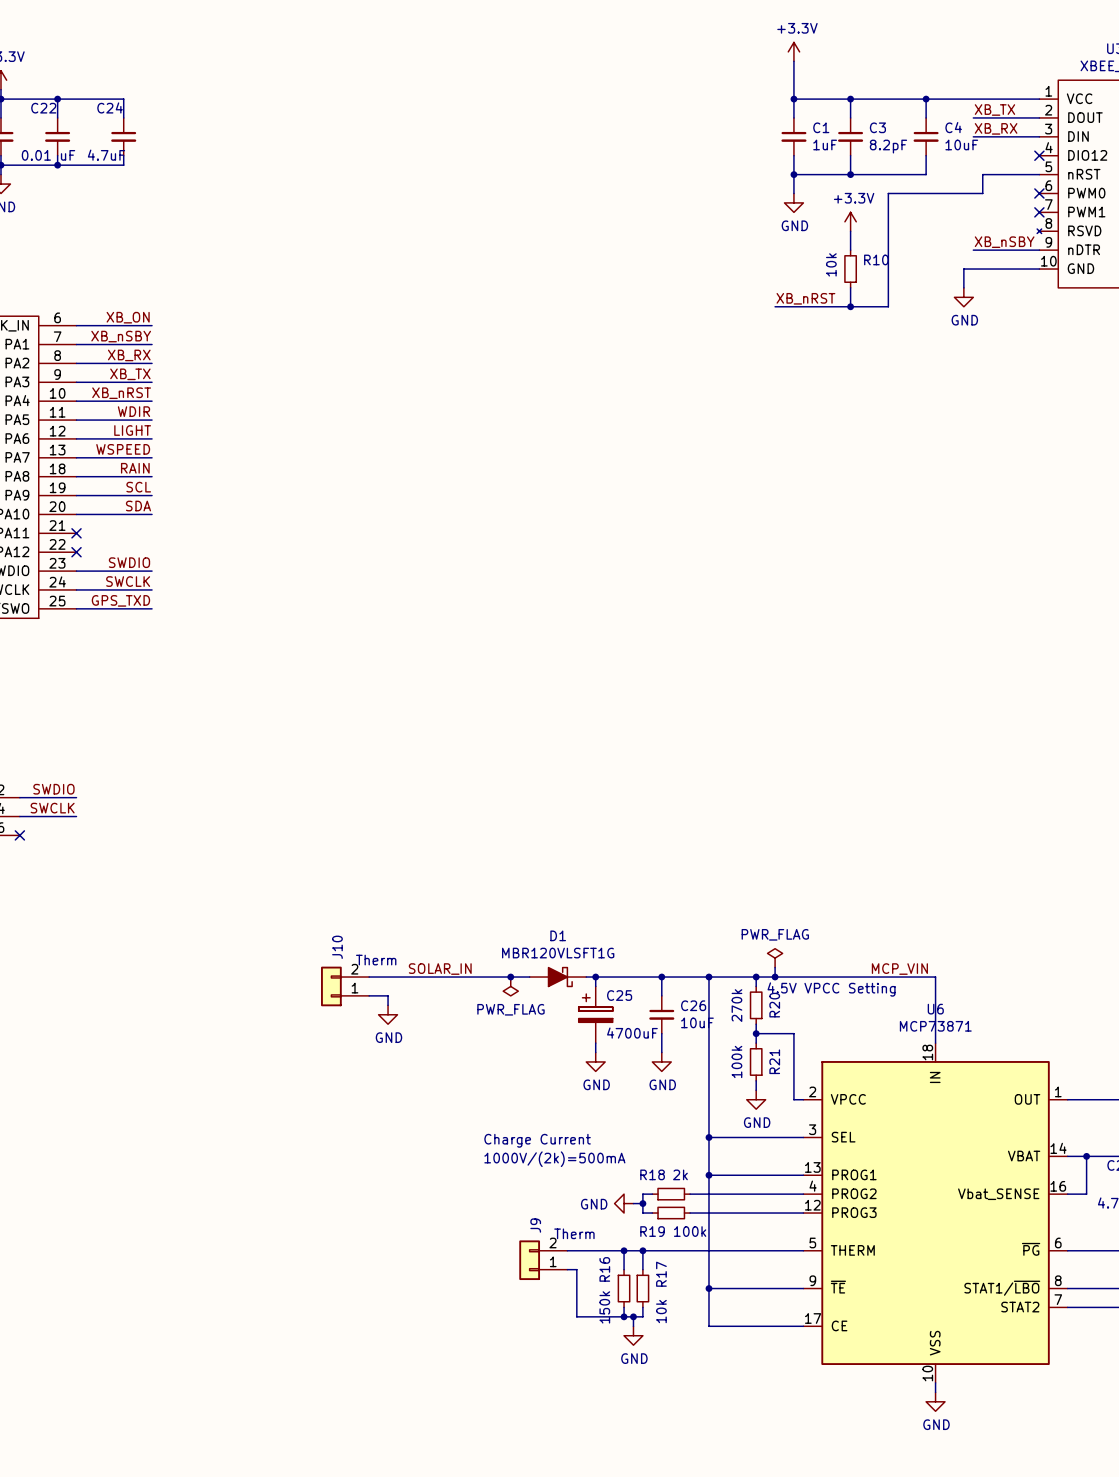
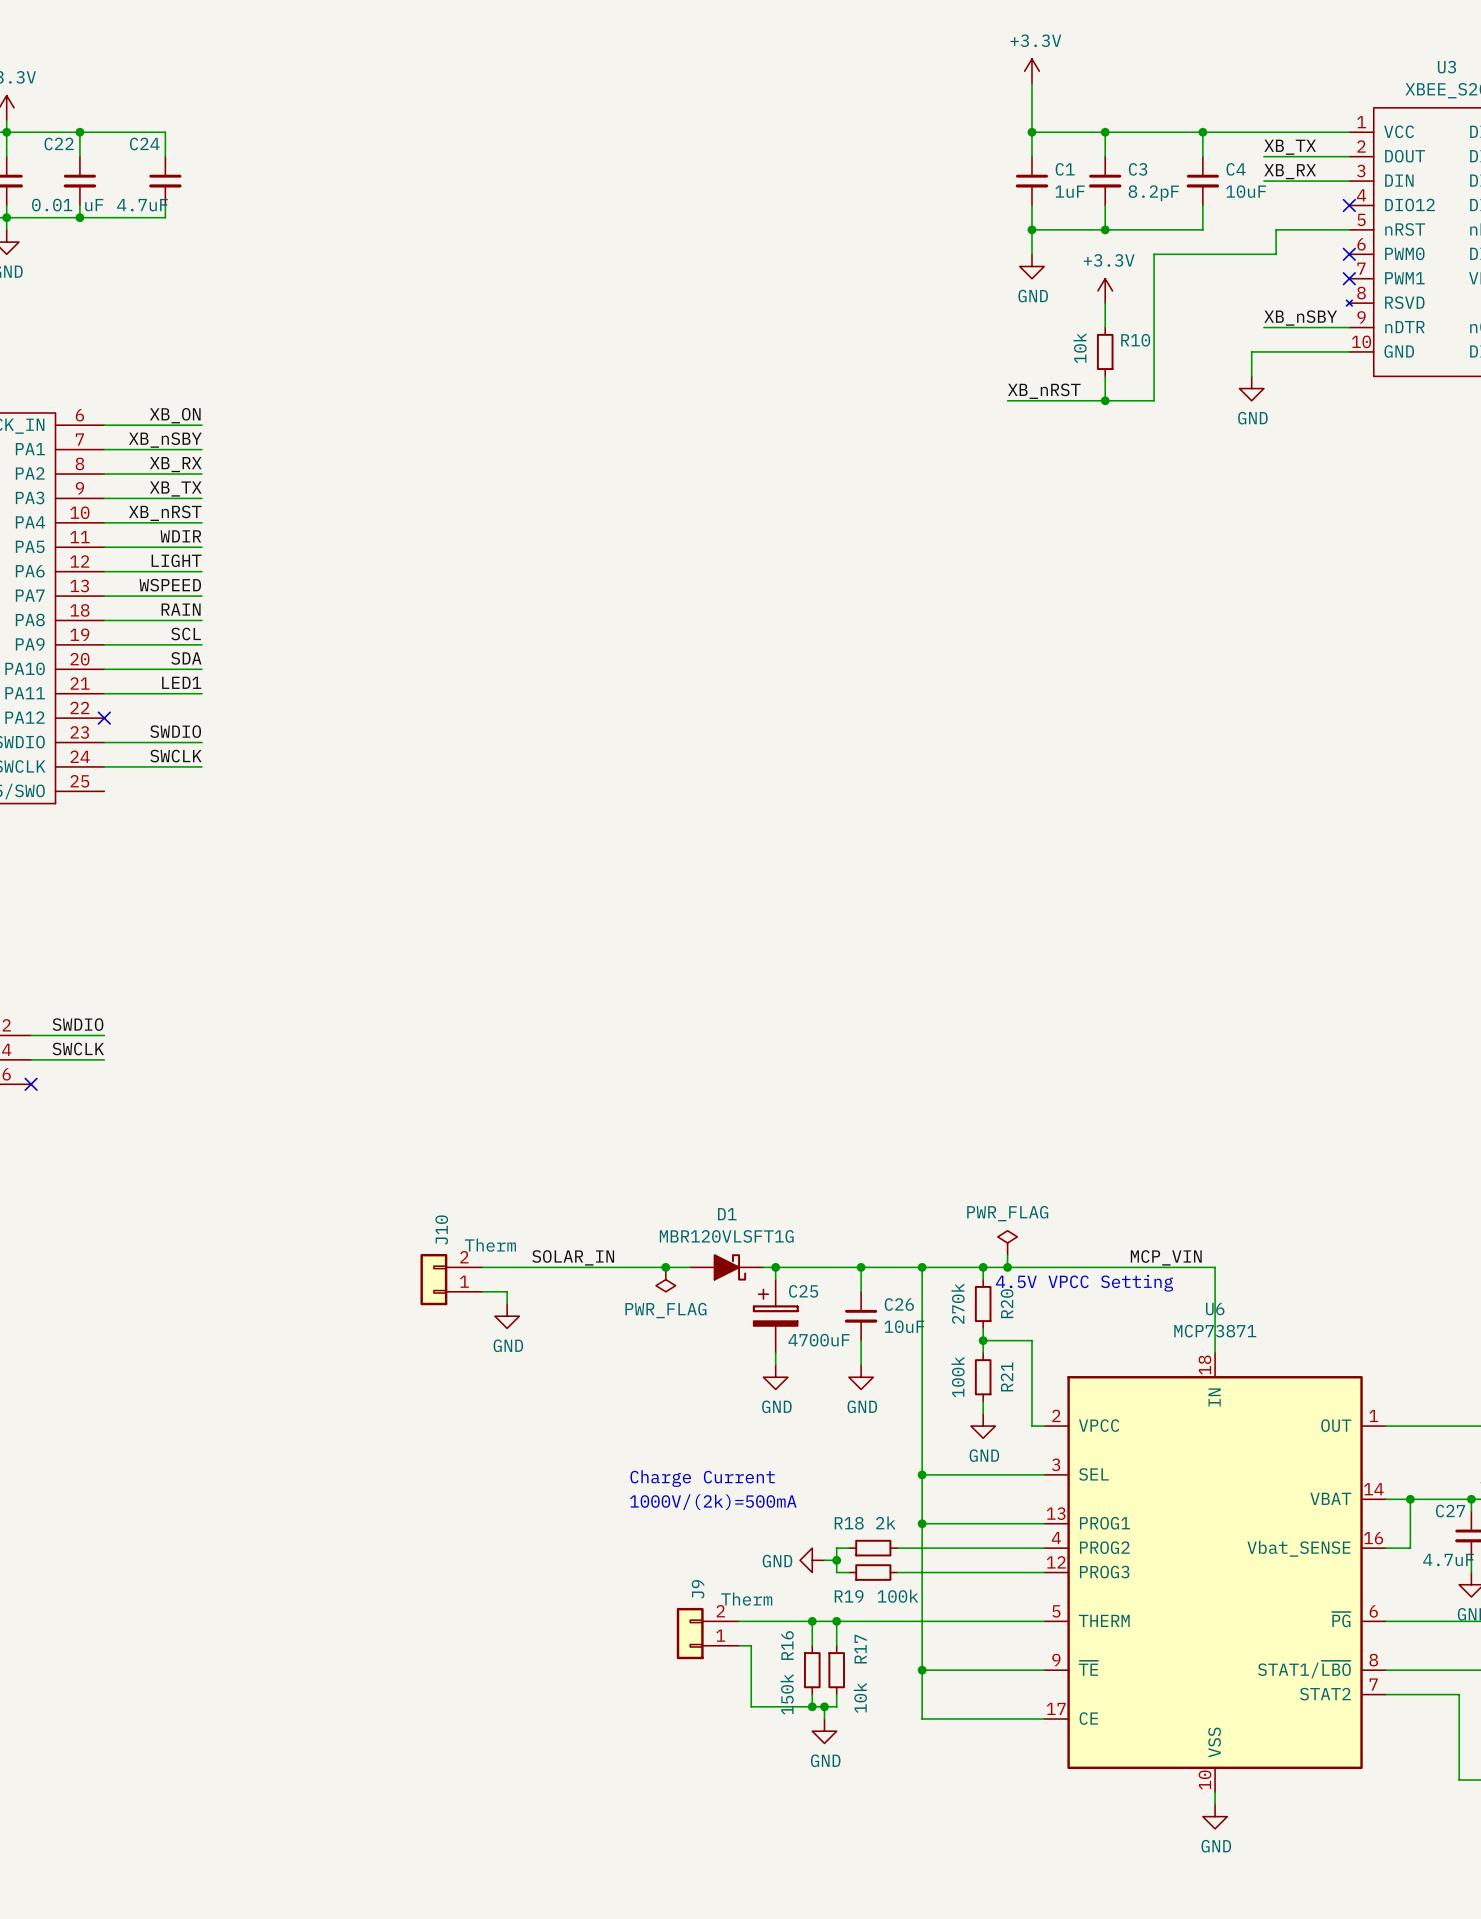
label: none -> LED1 (181, 682)
no-connect mark: (76, 533) -> none
label: GPS_TXD (120, 600) -> none
wire: (76, 608) (152, 608) -> (104, 693) (201, 693)

